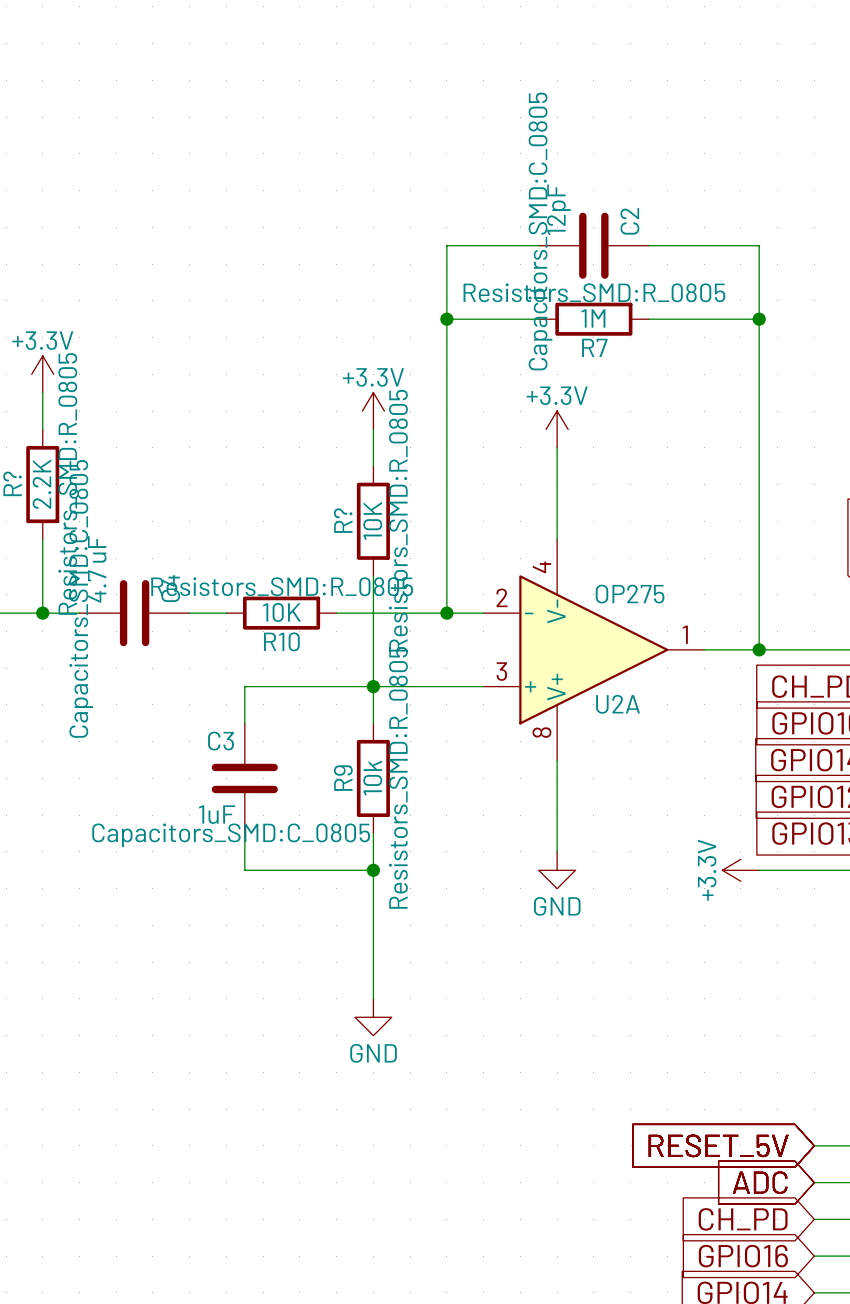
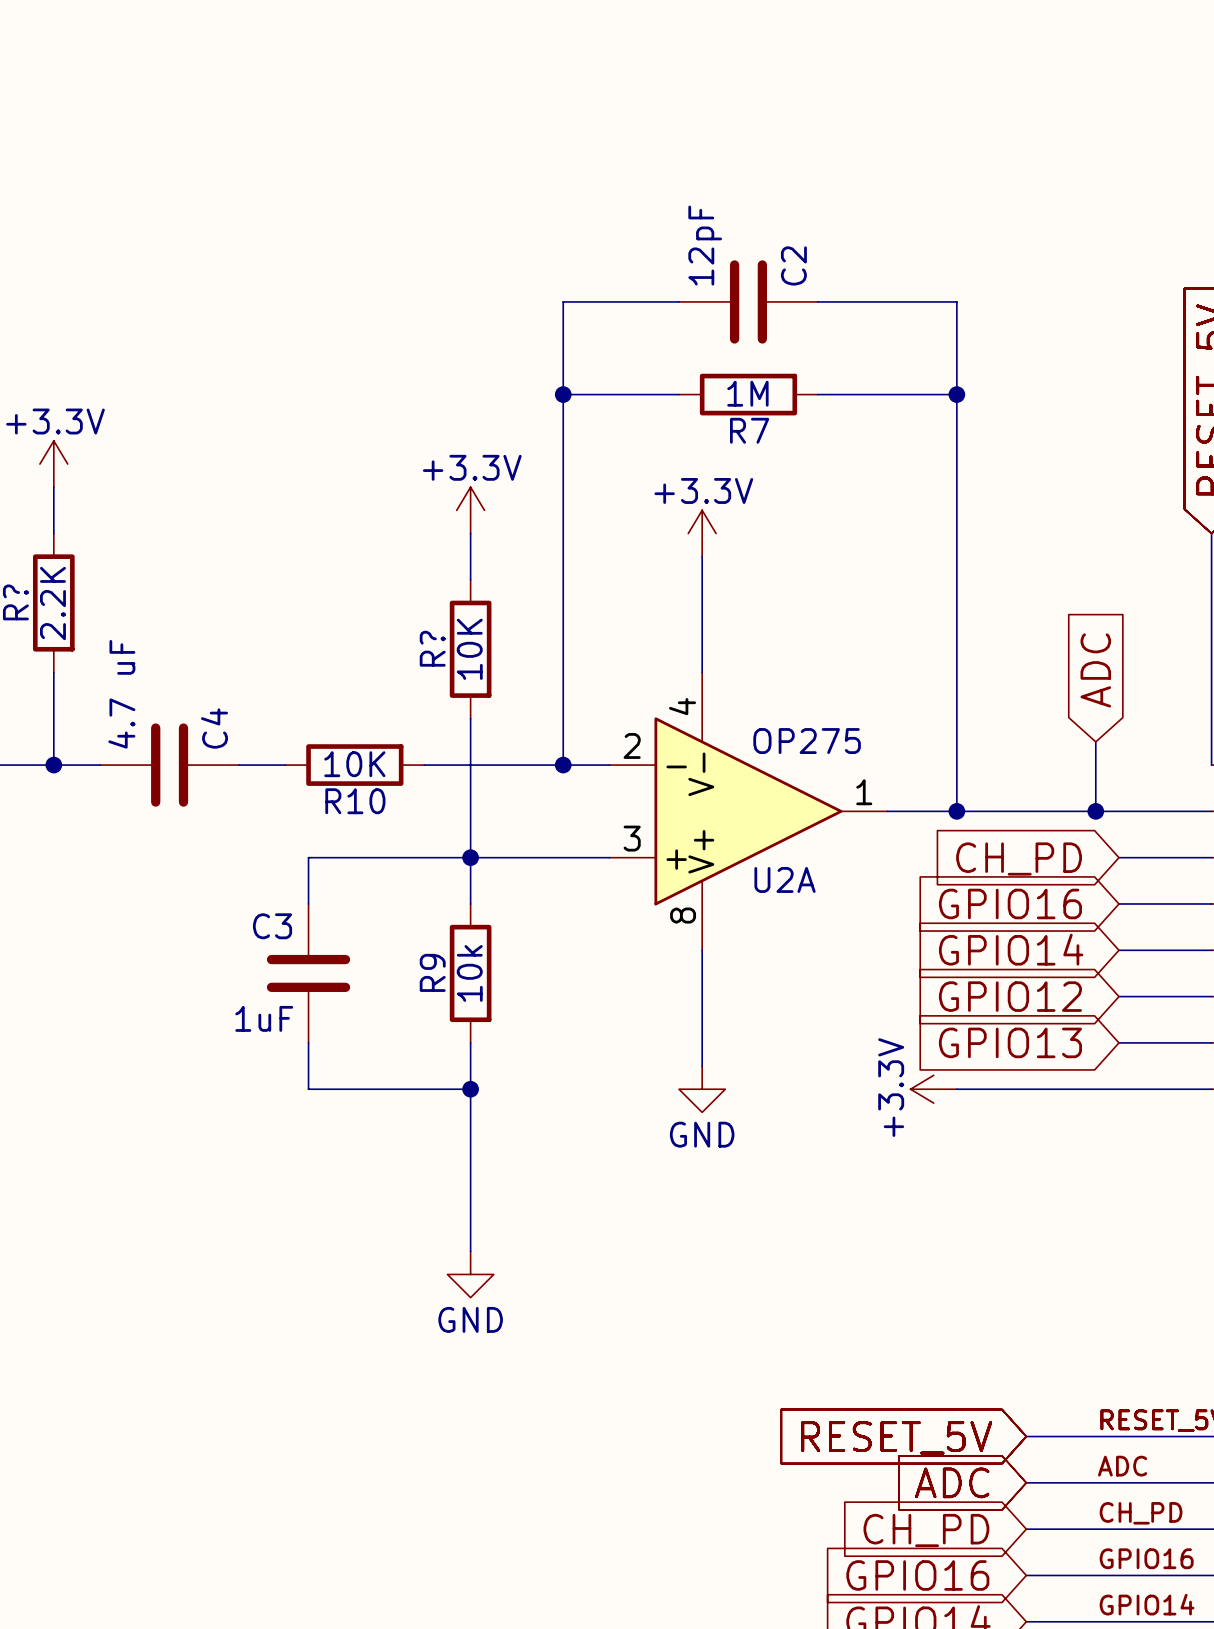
C2 text: Capacitors_SMD:C_0805 (540, 231) -> none
R7 text: Resistors_SMD:R_0805 (594, 292) -> none
R? text: Resistors_SMD:R_0805 (67, 483) -> none
R? text: Resistors_SMD:R_0805 (398, 520) -> none
R10 text: Resistors_SMD:R_0805 (282, 586) -> none
C4 text: Capacitors_SMD:C_0805 (81, 598) -> none
R9 text: Resistors_SMD:R_0805 (398, 777) -> none
C3 text: Capacitors_SMD:C_0805 (231, 835) -> none

